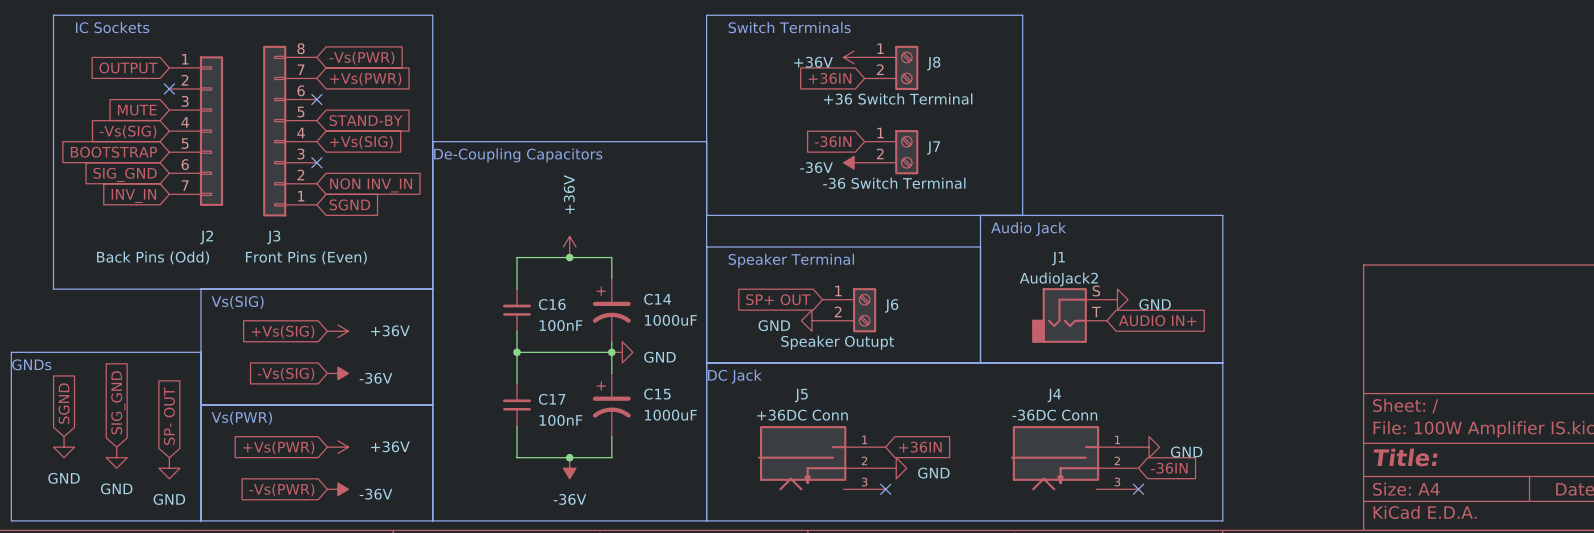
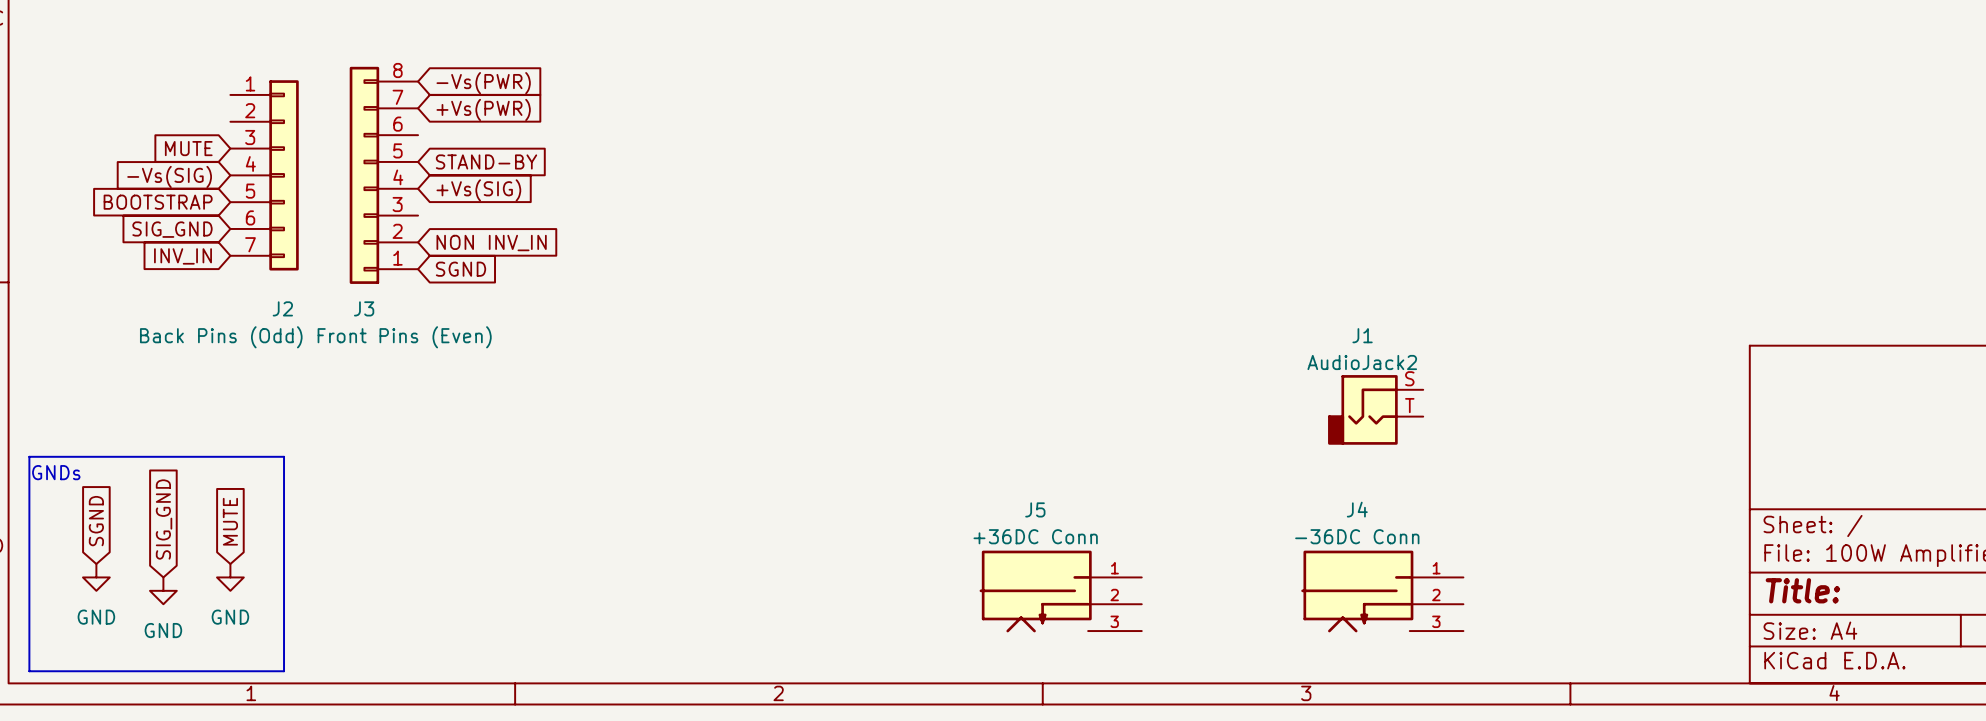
text: IC Sockets (112, 27) -> none
text: Switch Terminals (789, 27) -> none
power symbol: +36V (854, 57) -> none
global label: OUTPUT (128, 67) -> none
J8: +36 Switch Terminal (891, 67) -> none
global label: +36IN (830, 78) -> none
no-connect mark: (169, 88) -> none
no-connect mark: (316, 99) -> none
line: (432, 141) (706, 141) -> none
global label: -36IN (833, 141) -> none
J7: -36 Switch Terminal (891, 152) -> none
text: De-Coupling Capacitors (518, 155) -> none
no-connect mark: (316, 162) -> none
power symbol: -36V (854, 162) -> none
line: (706, 215) (1222, 215) (1222, 520) (211, 520) -> (270, 456) (284, 456) (284, 671)
line: (980, 215) (980, 362) -> none
line: (1022, 215) (1022, 15) (706, 15) (706, 520) -> none
text: Audio Jack (1028, 229) -> none
power symbol: +36V (569, 247) -> none
line: (706, 247) (980, 247) -> none
junction: (569, 257) -> none
text: Speaker Terminal (791, 260) -> none
wire: (611, 278) (611, 257) (517, 257) (517, 289) -> none
line: (200, 289) (200, 520) -> none
line: (432, 289) (53, 289) (53, 15) (432, 15) (432, 520) -> none
global label: SP+ OUT (778, 299) -> none
power symbol: GND (1117, 299) -> none
text: Vs(SIG) (237, 302) -> none
C16: 100nF (517, 310) -> none
C14: 1000uF (611, 310) -> none
J6: Speaker Outupt (849, 310) -> none
power symbol: GND (811, 320) -> none
global label: AUDIO IN+ (1157, 320) -> none
power symbol: +36V (337, 331) -> none
wire: (517, 331) (517, 383) -> none
global label: +Vs(SIG) (282, 332) -> none
wire: (611, 341) (611, 373) -> none
wire: (517, 352) (611, 352) -> none
junction: (517, 352) -> none
junction: (611, 352) -> none
power symbol: GND (622, 352) -> none
line: (706, 362) (1222, 362) -> none
power symbol: -36V (337, 373) -> none
global label: -Vs(SIG) (286, 374) -> none
text: DC Jack (734, 376) -> none
global label: none -> MUTE (230, 521)
line: (200, 405) (432, 405) -> none
C17: 100nF (517, 405) -> none
C15: 1000uF (611, 405) -> none
global label: SP- OUT (169, 416) -> none
text: Vs(PWR) (241, 418) -> none
wire: (517, 426) (517, 457) (611, 457) (611, 436) -> none
global label: +Vs(PWR) (278, 447) -> none
power symbol: +36V (337, 447) -> none
global label: +36IN (920, 447) -> none
power symbol: GND (1149, 447) -> none
junction: (569, 457) -> none
power symbol position: GND (169, 468) -> GND (230, 577)
power symbol: -36V (569, 468) -> none
power symbol: GND (896, 468) -> none
global label: -36IN (1169, 468) -> none
power symbol: -36V (337, 489) -> none
no-connect mark: (885, 489) -> none
no-connect mark: (1138, 489) -> none
global label: -Vs(PWR) (281, 490) -> none

